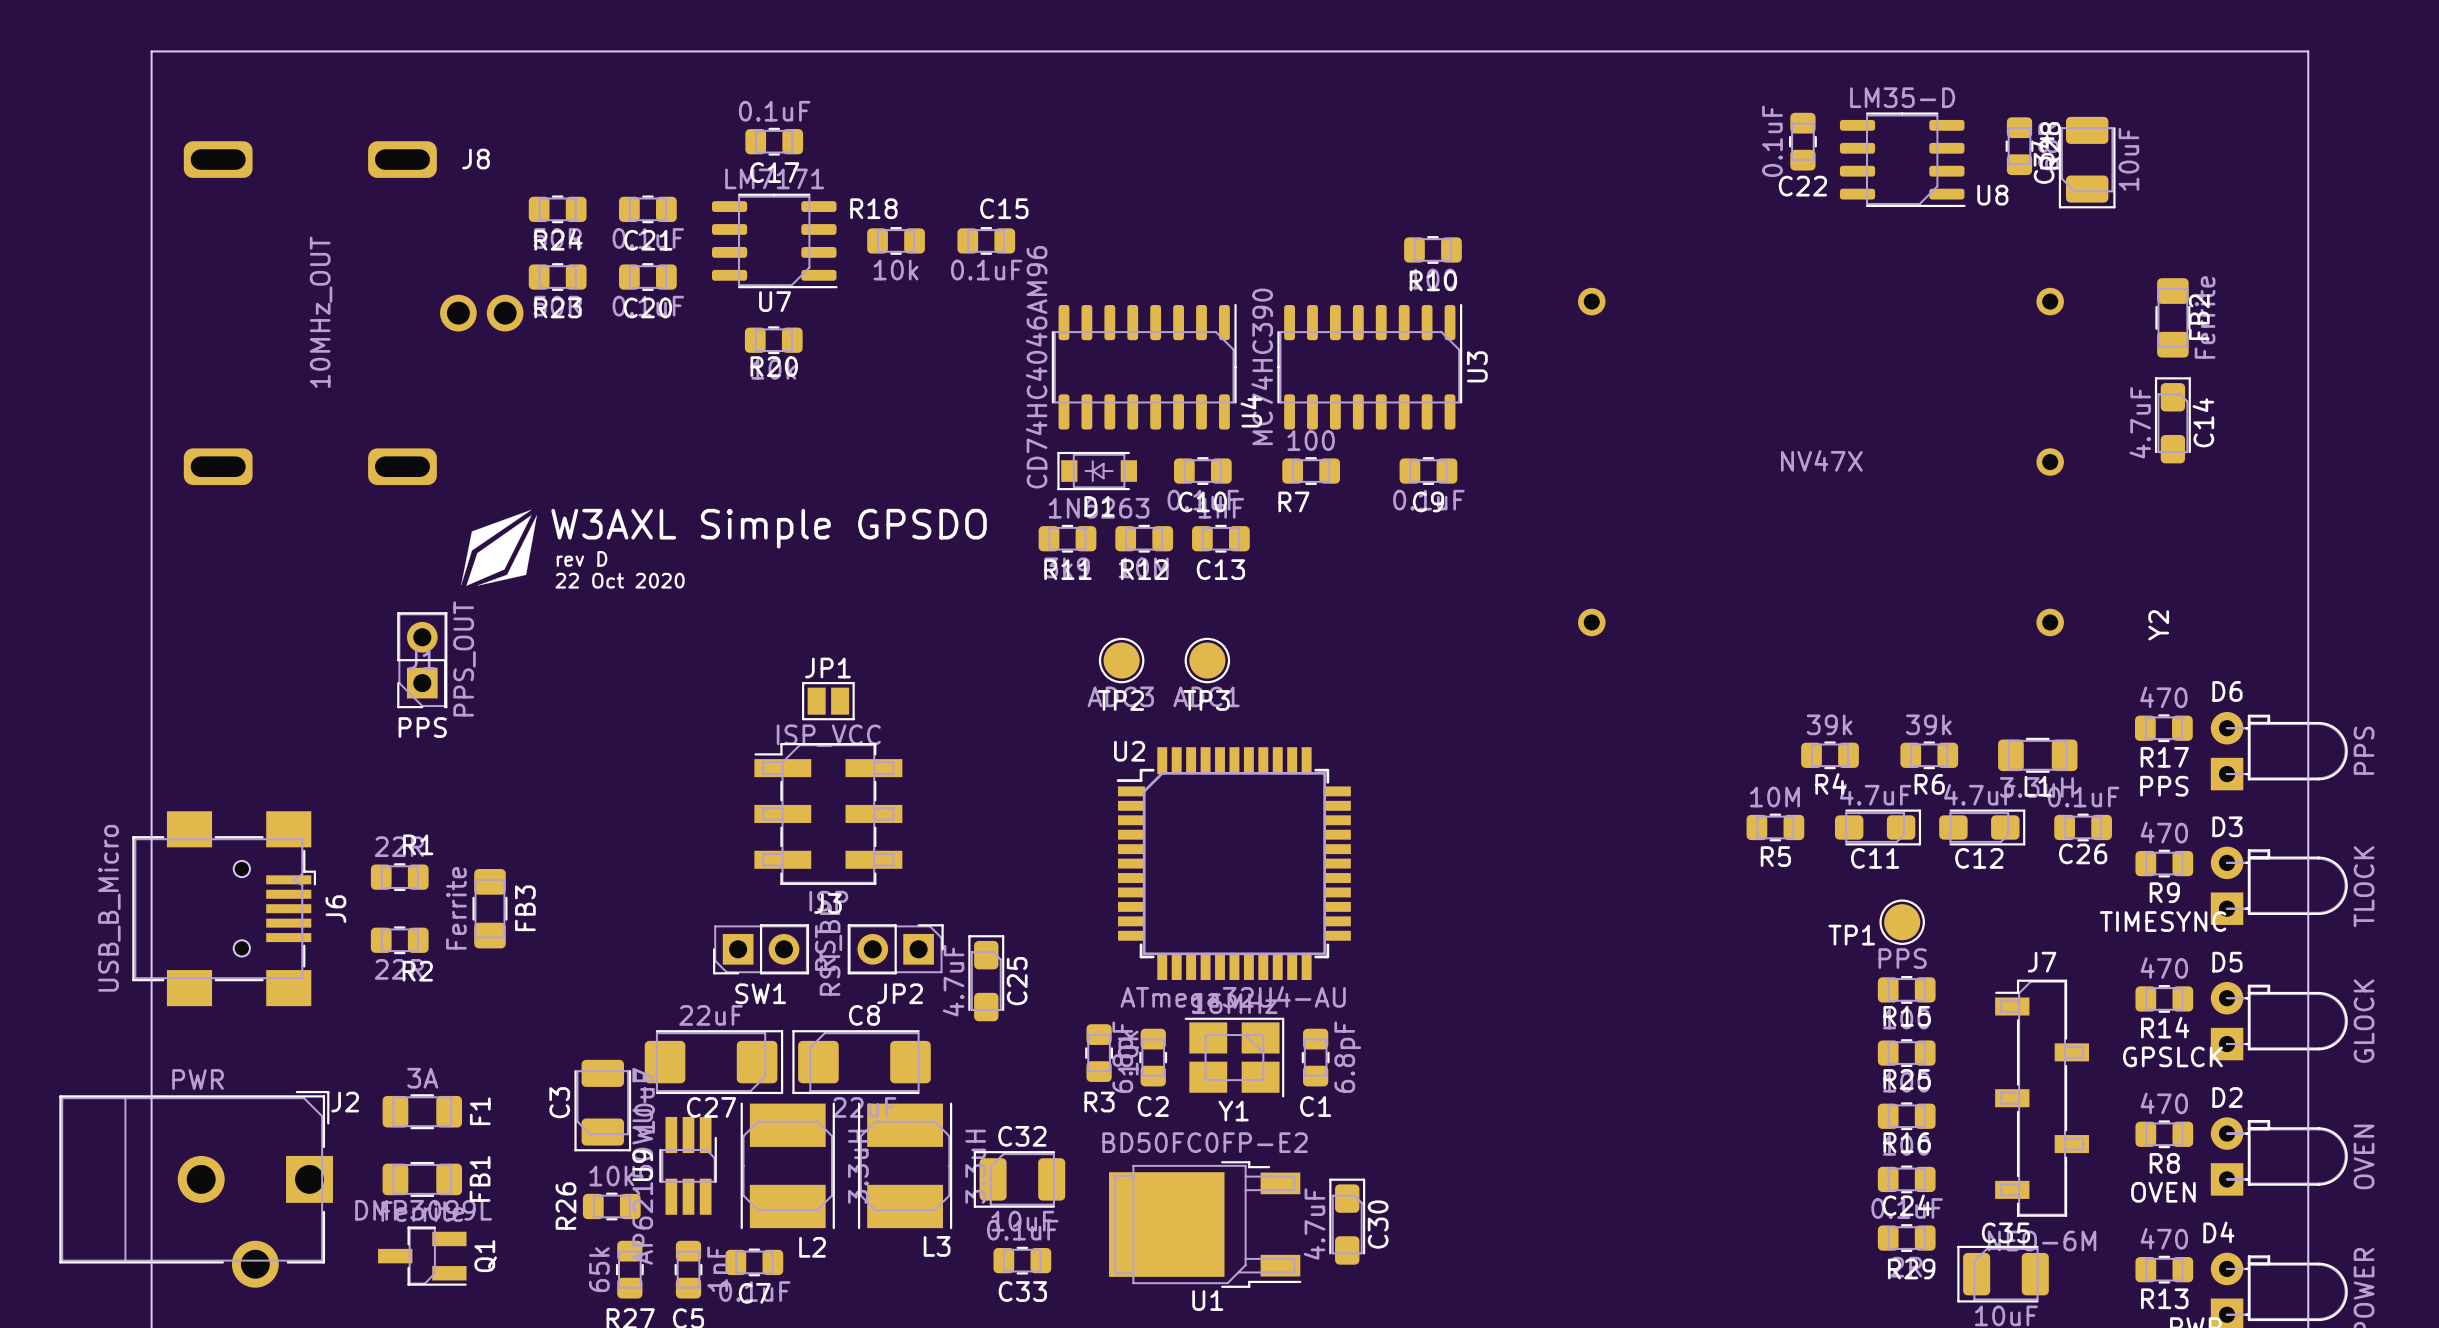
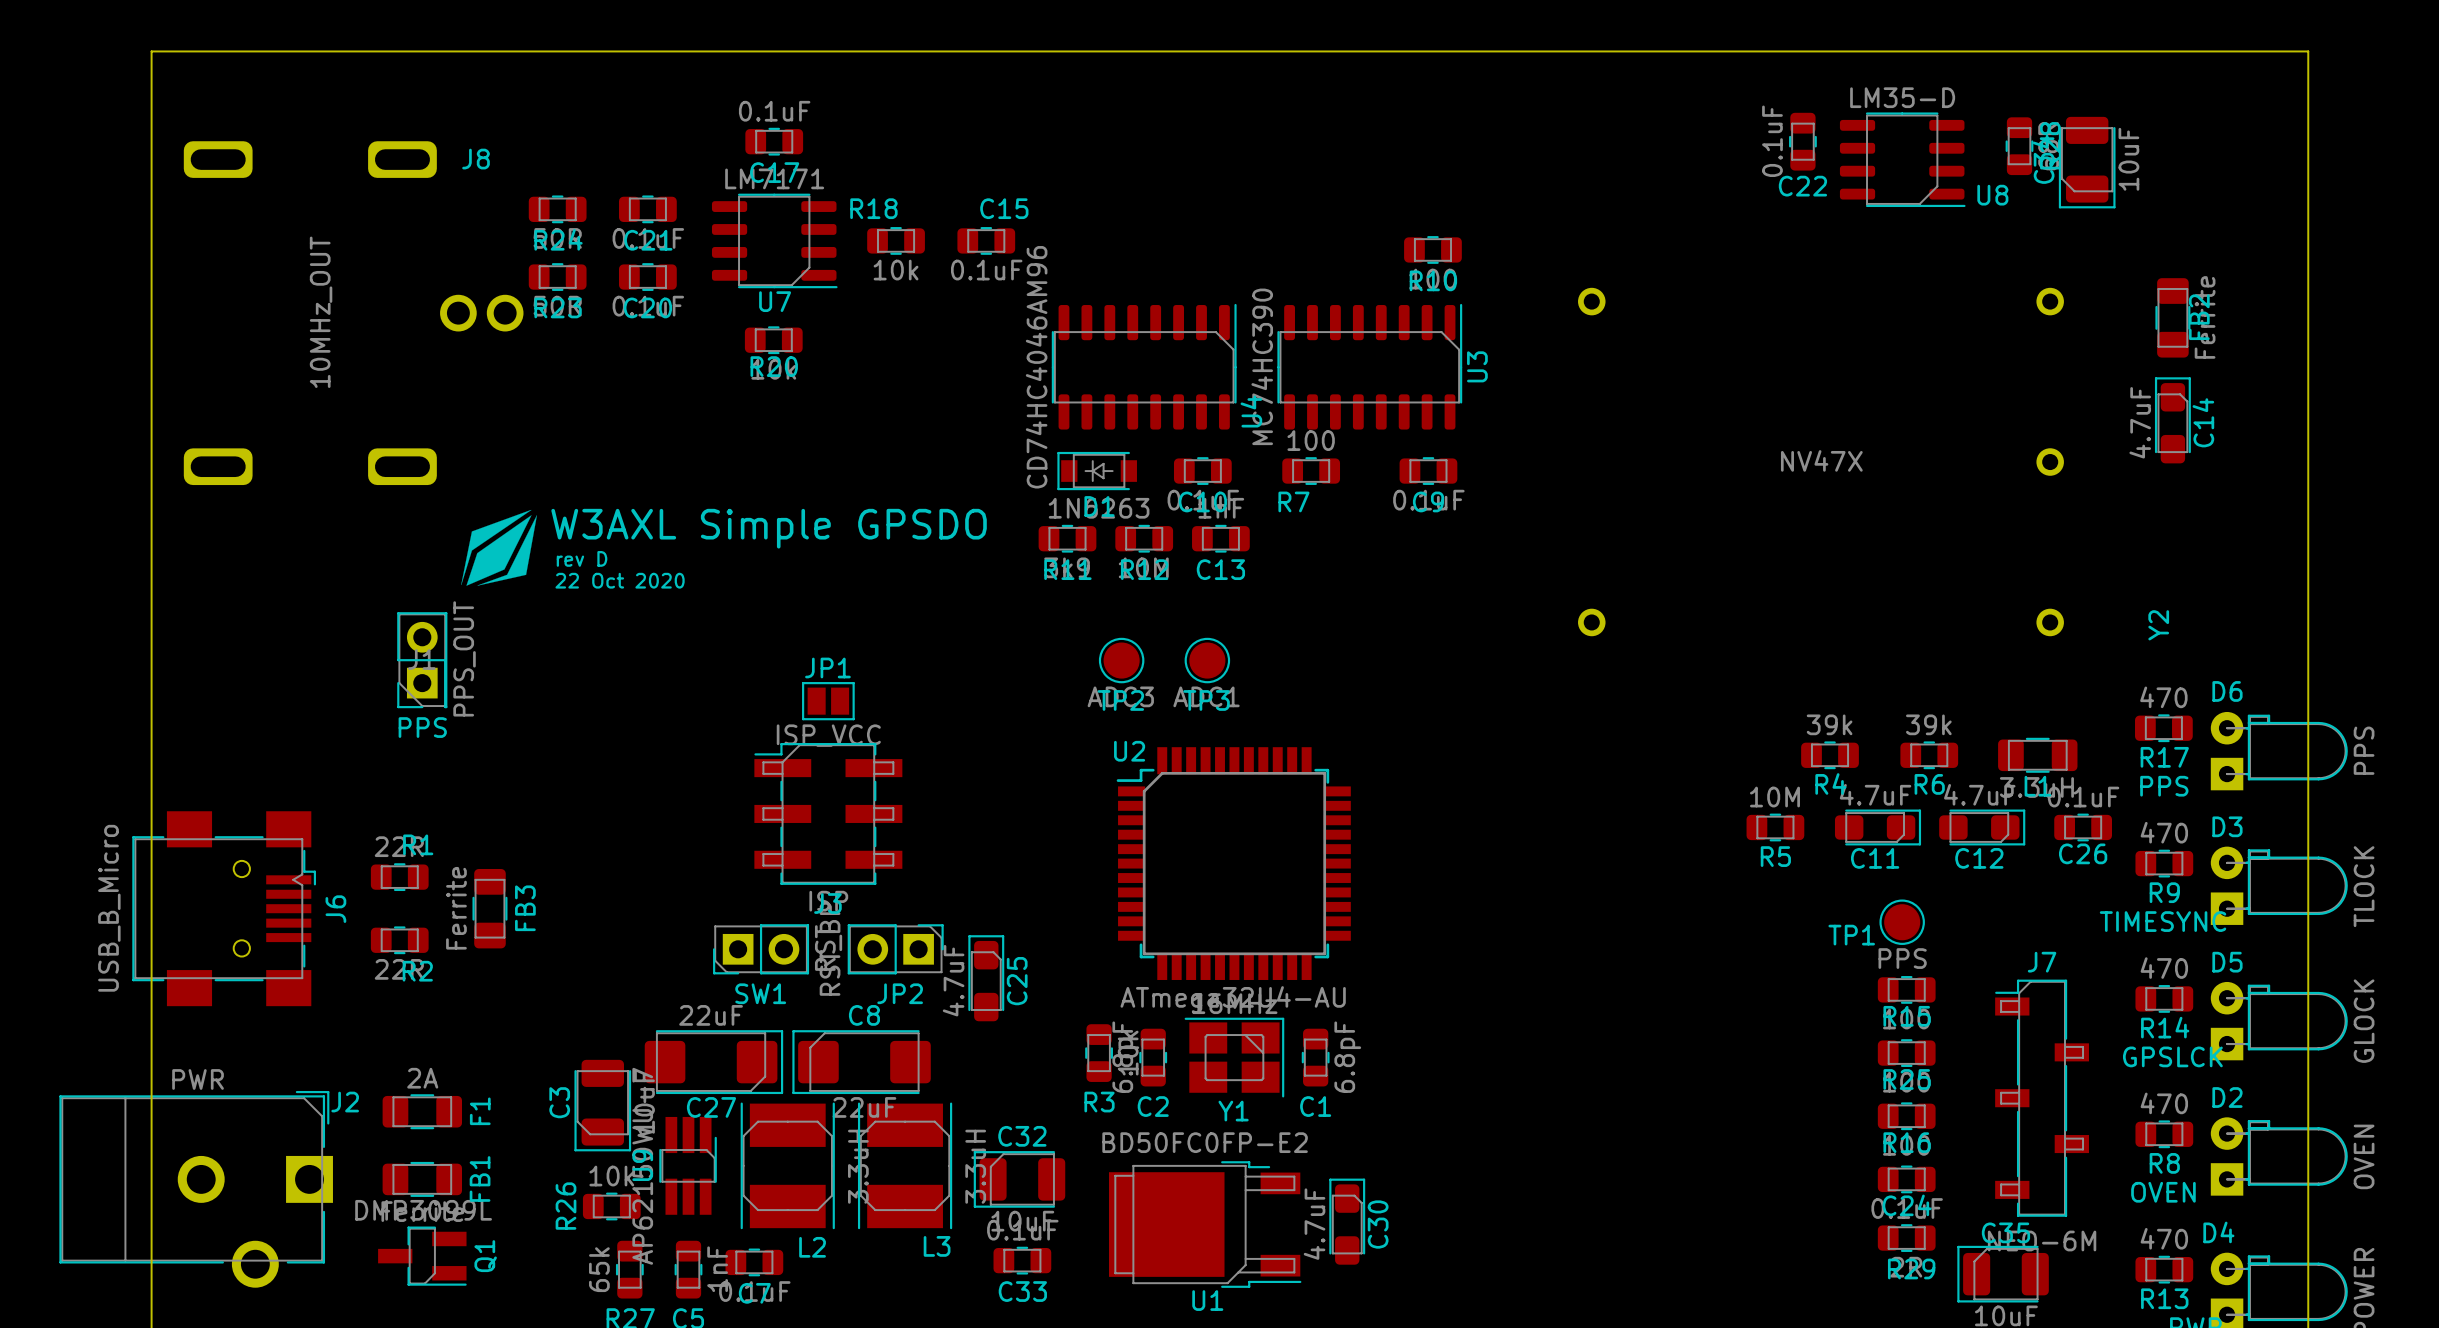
F1 value: 3A (422, 1078) -> 2A (422, 1078)

